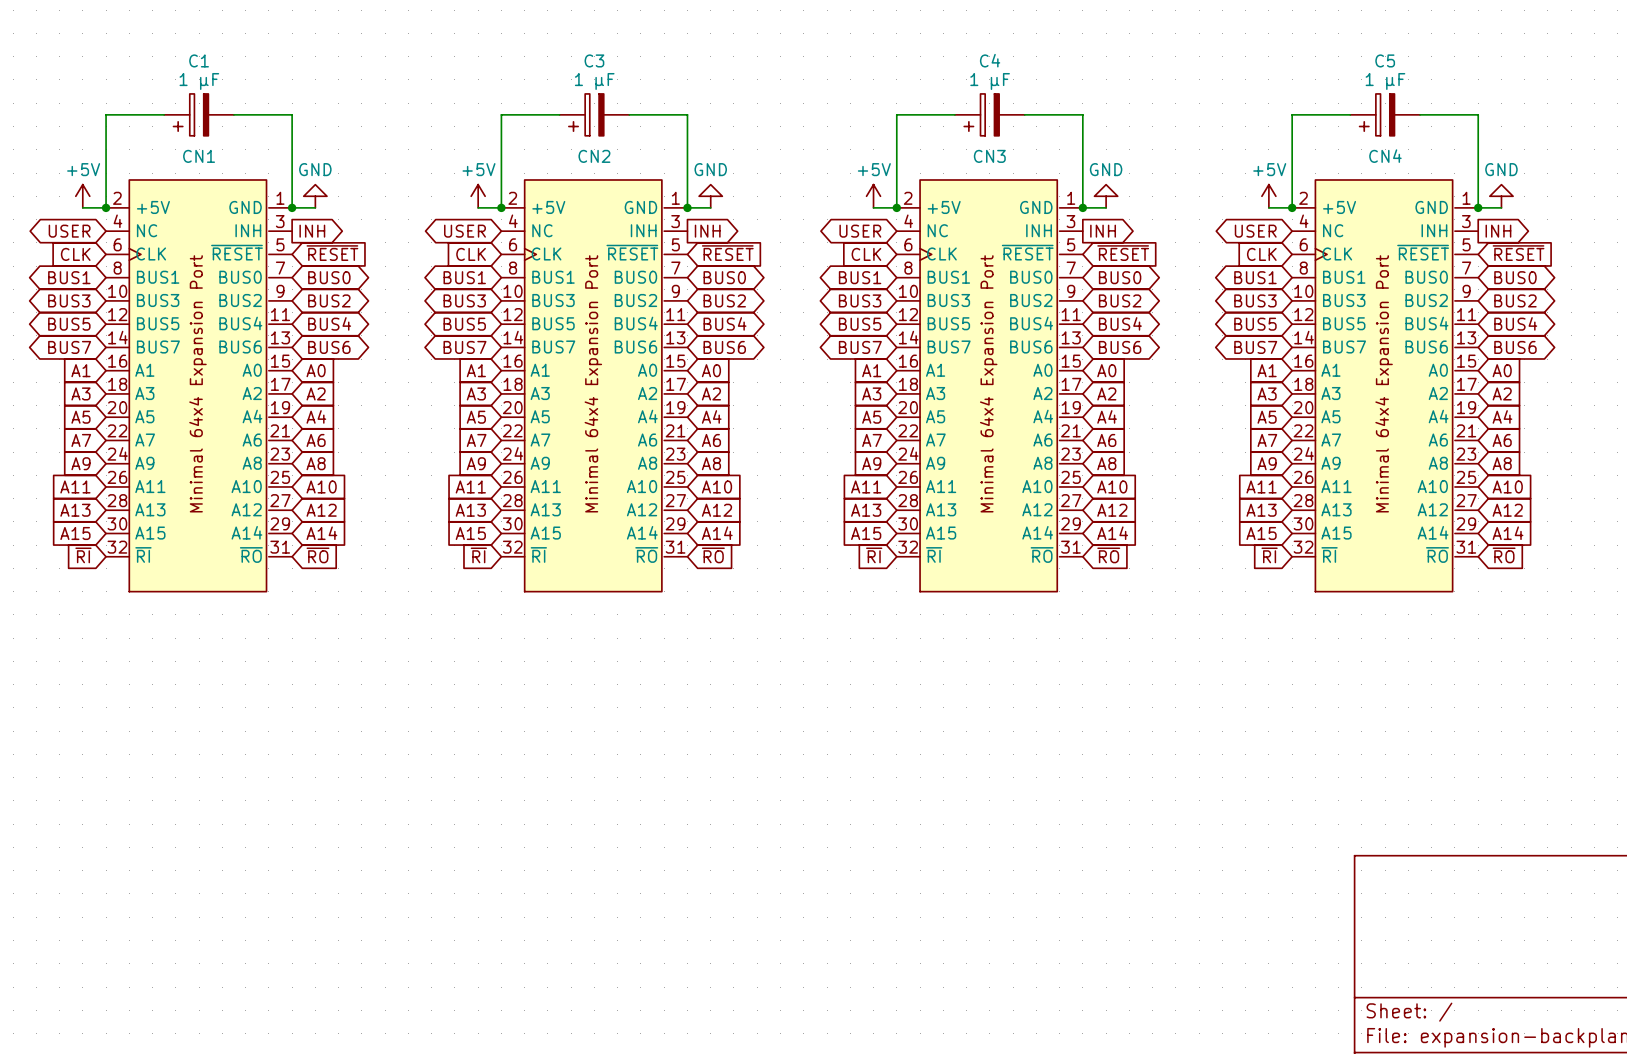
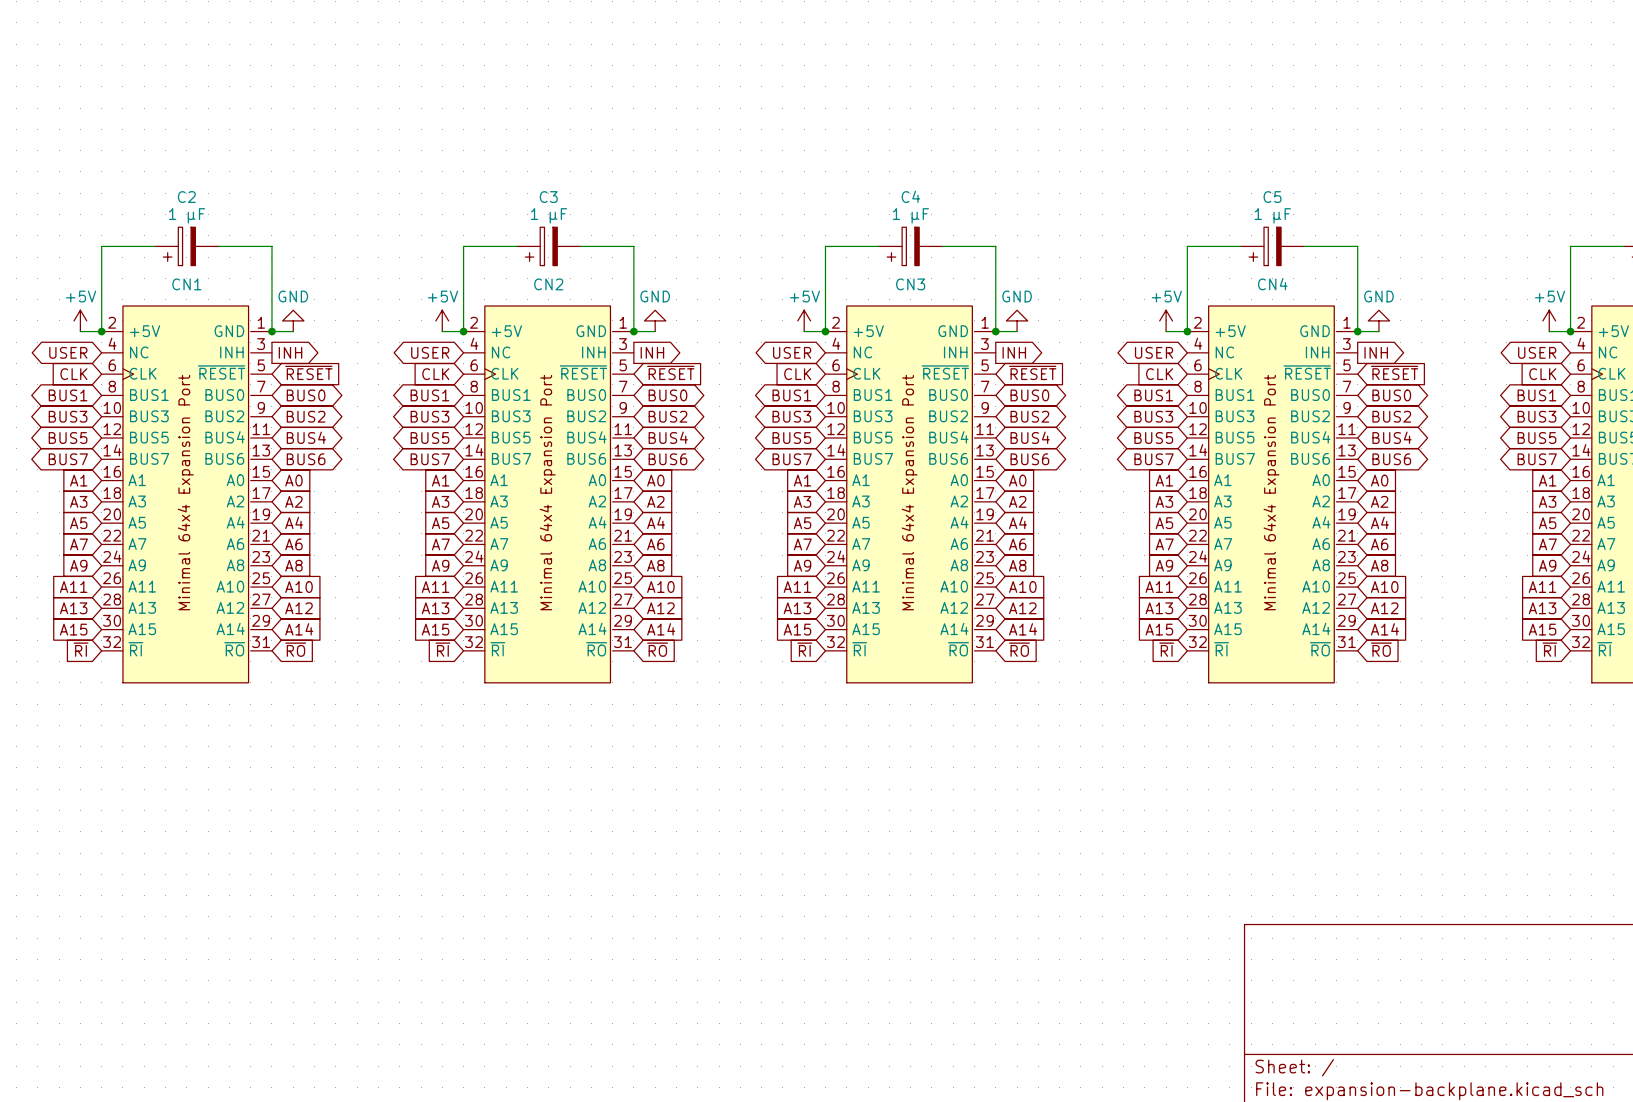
C1 name: C1 (199, 60) -> C2 (186, 197)

